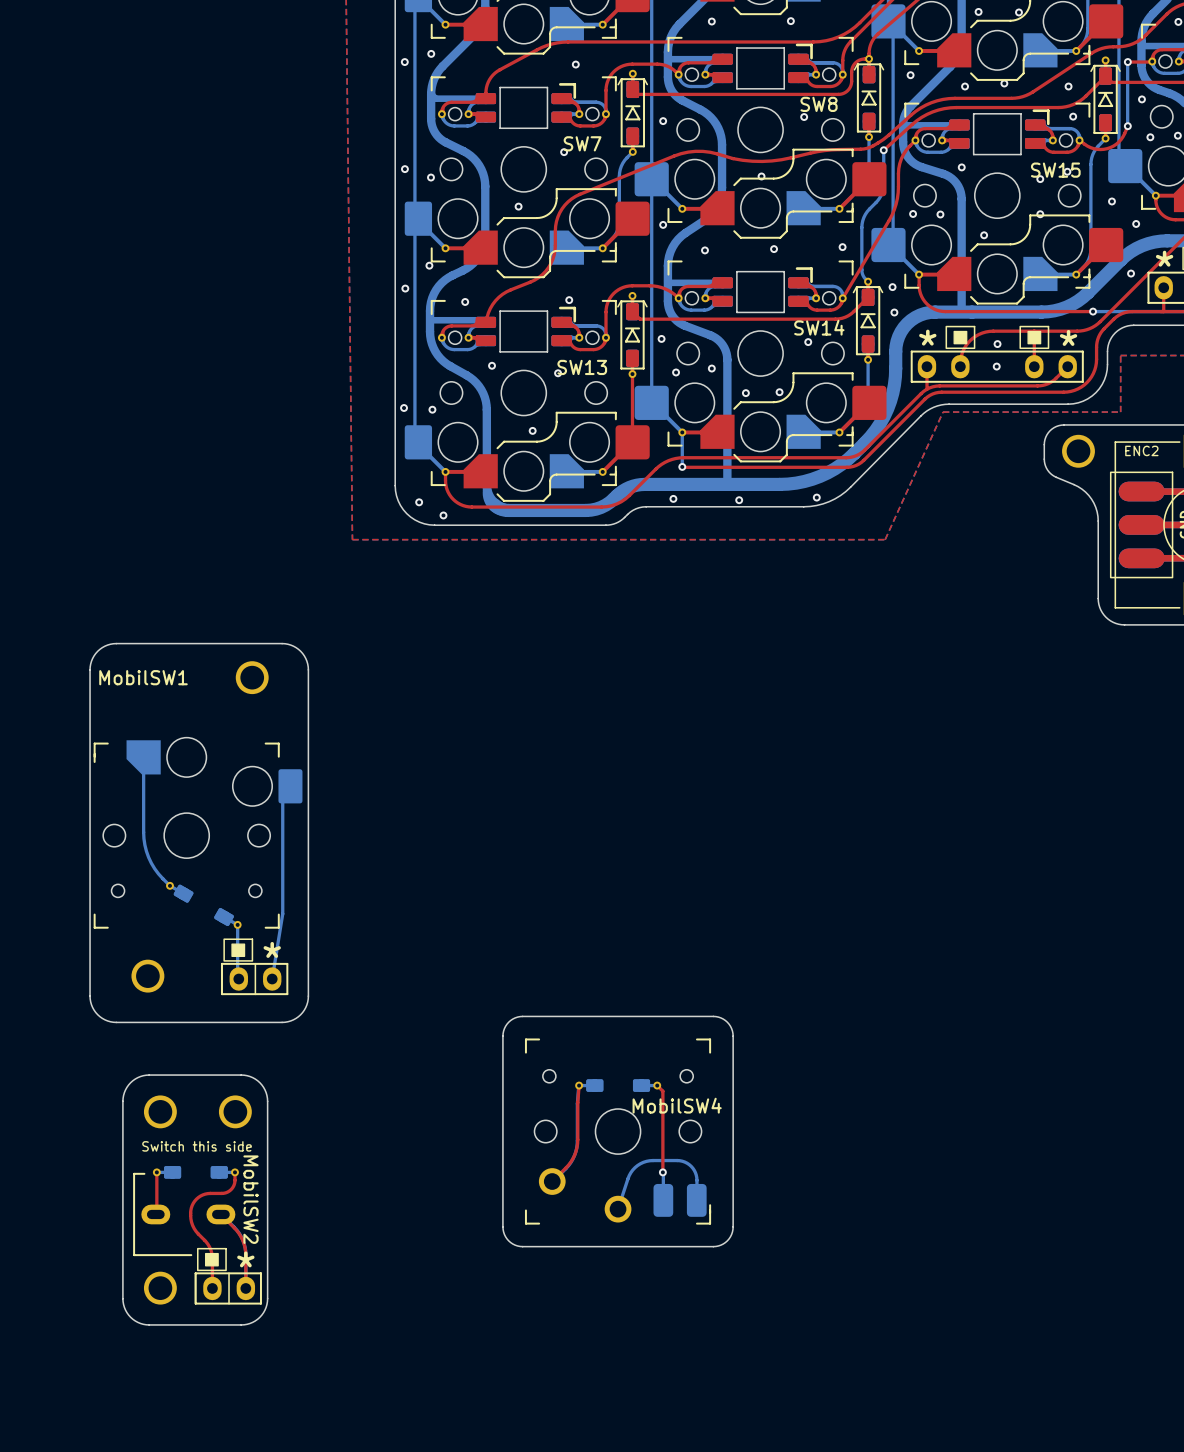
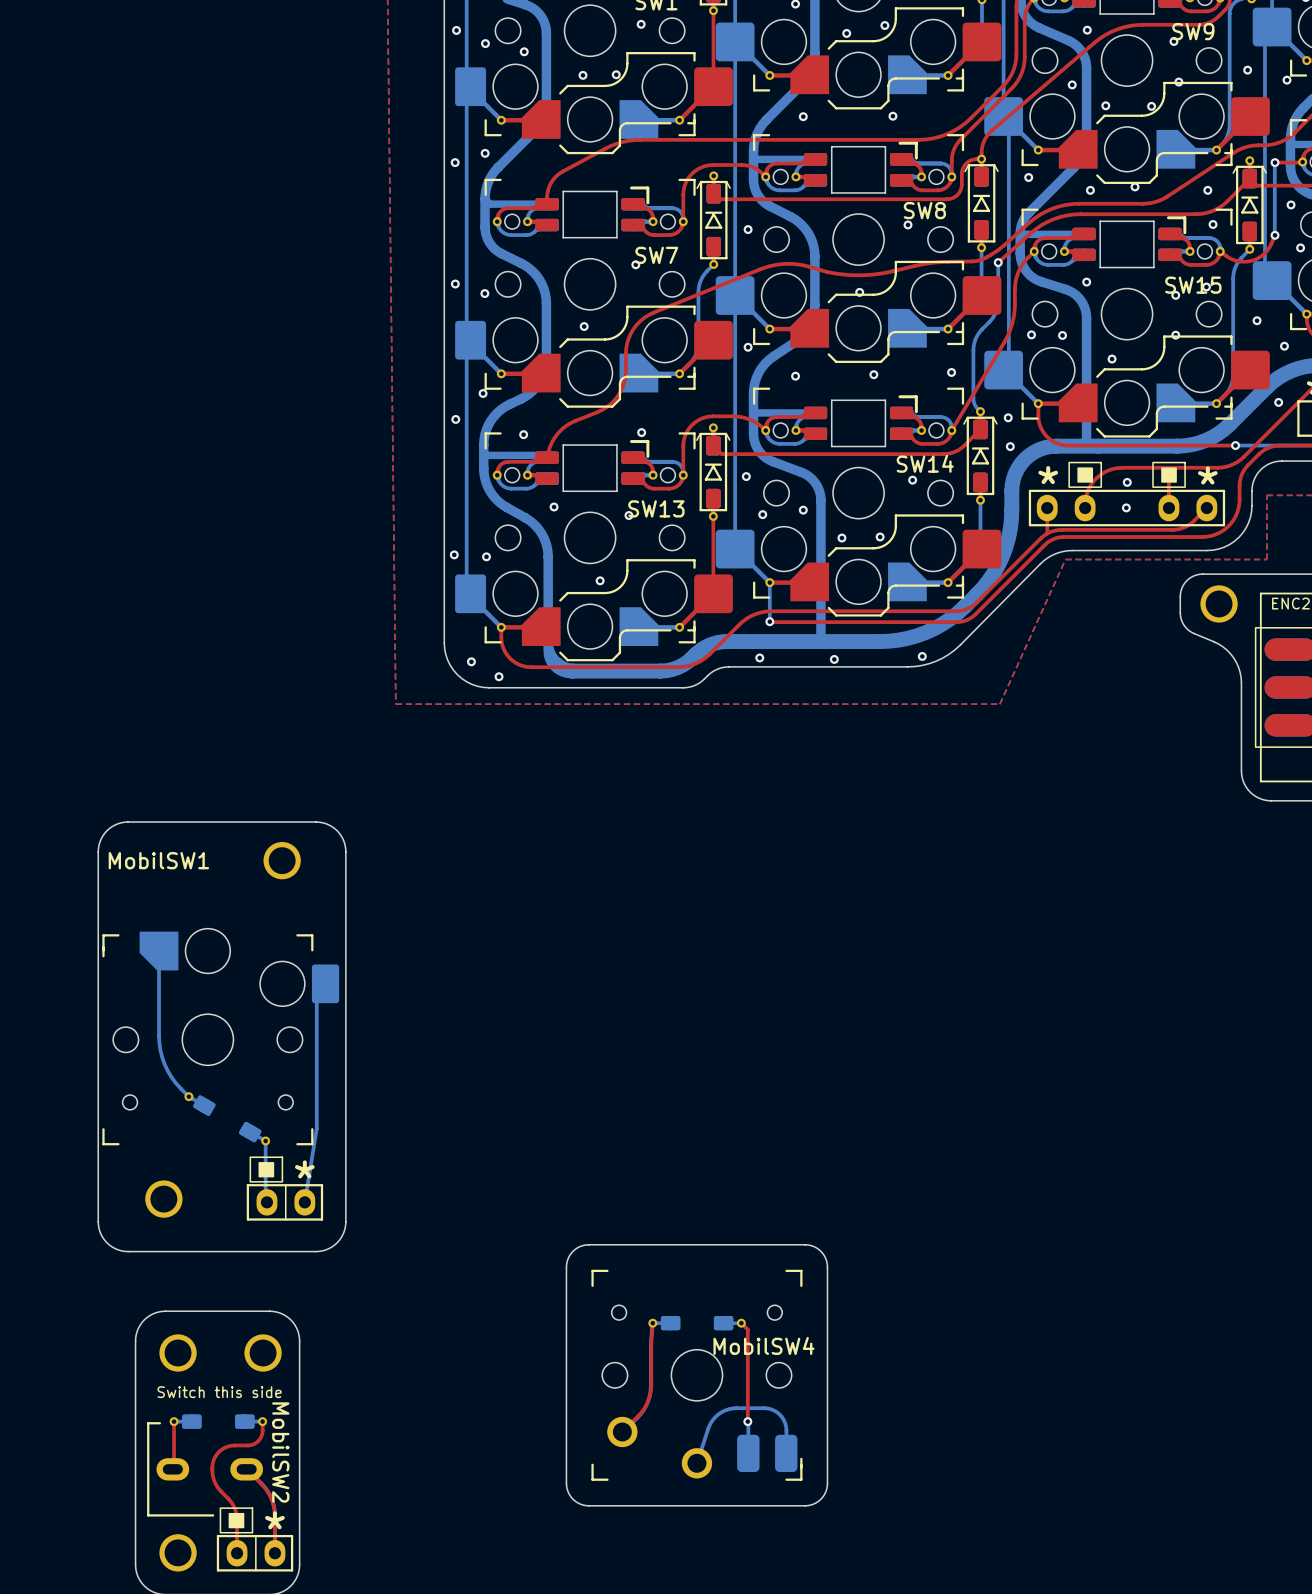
via: (575, 64) -> none

